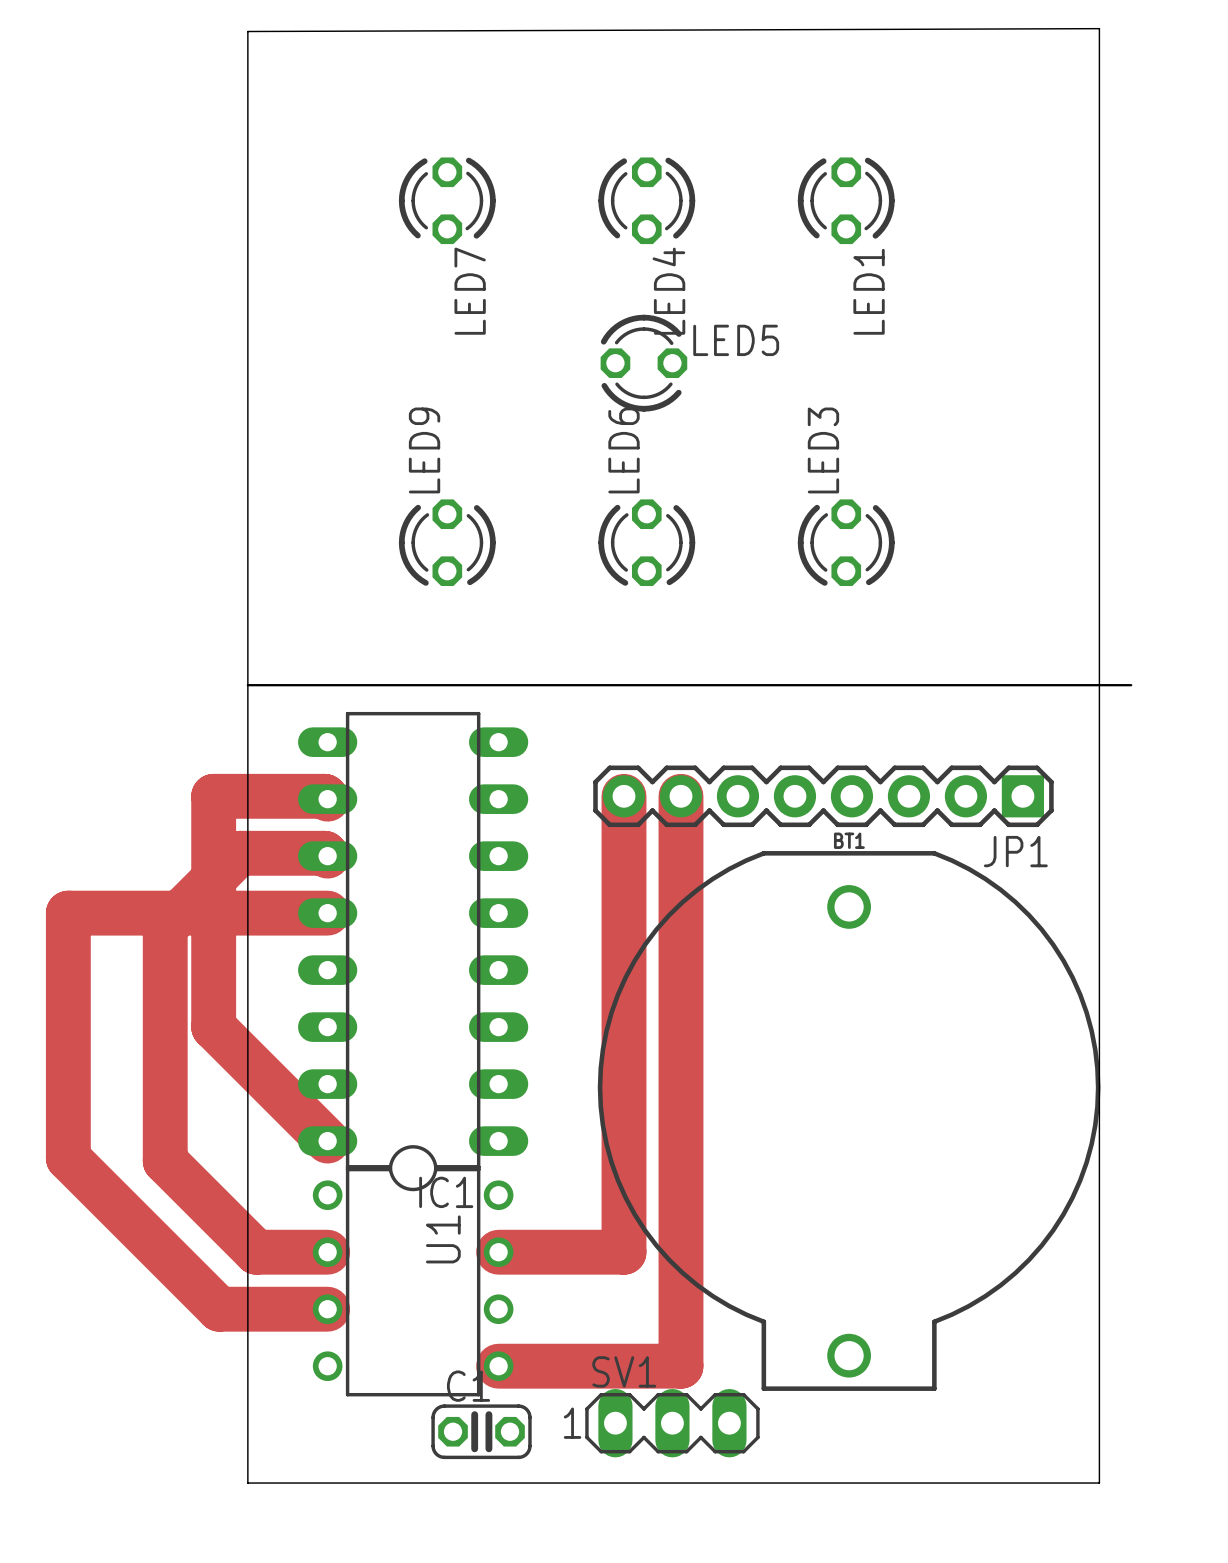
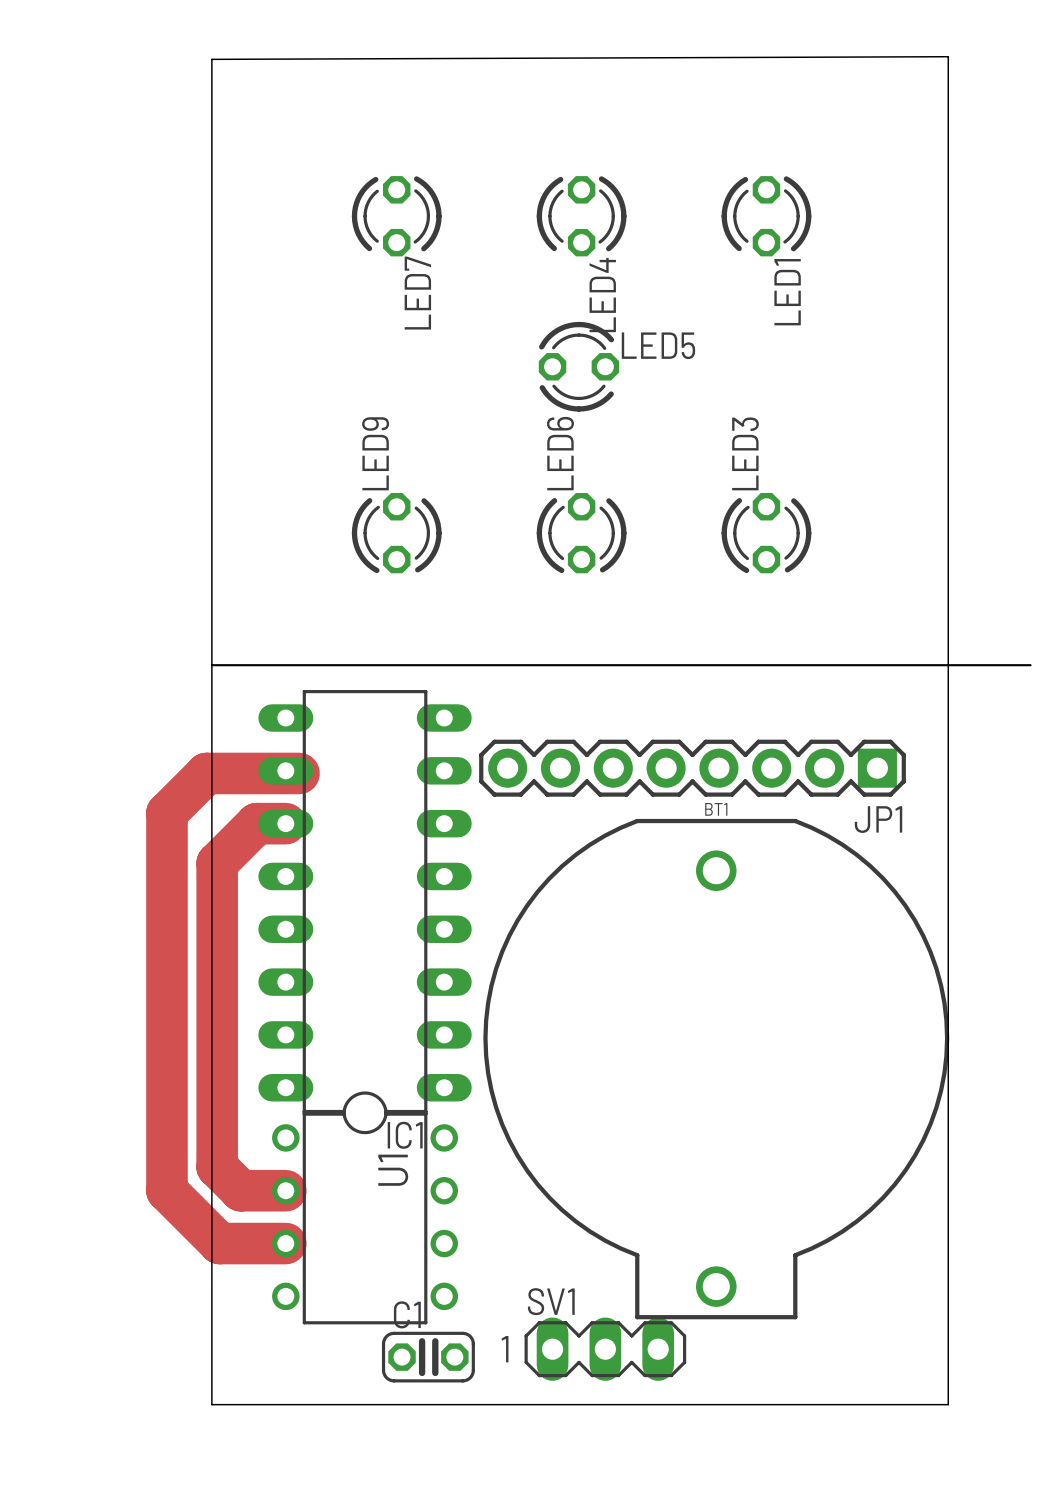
board edge: (247, 31) (1099, 28) (1099, 1483) (1042, 1483) -> (211, 59) (948, 56) (948, 1404)
track: (623, 796) (623, 1252) (498, 1252) -> none
track: (680, 796) (680, 1366) (498, 1366) -> none
JP1 position: (823, 796) -> (692, 768)
track: (327, 799) (324, 796) (213, 796) (213, 1027) (327, 1141) -> none
track: (327, 856) (324, 853) (239, 853) (165, 927) (165, 1161) (256, 1252) (279, 1252) -> (285, 823) (256, 823) (217, 863) (217, 1166) (240, 1190)
track: (327, 913) (68, 913) (68, 1158) (219, 1309) (256, 1309) -> (299, 773) (206, 773) (166, 813) (166, 1190) (219, 1243)
BT1 position: (849, 1120) -> (716, 1069)

